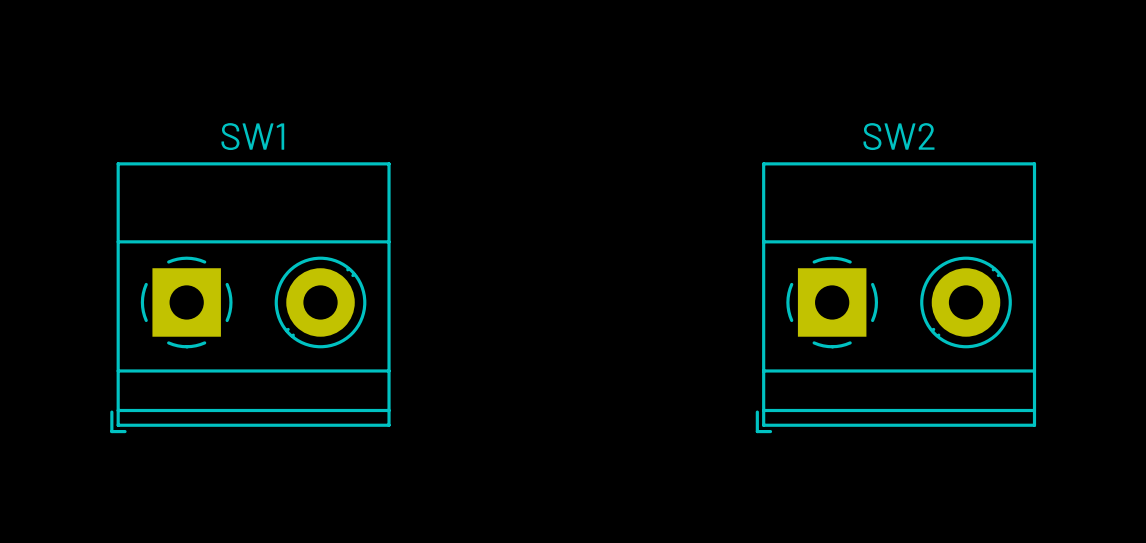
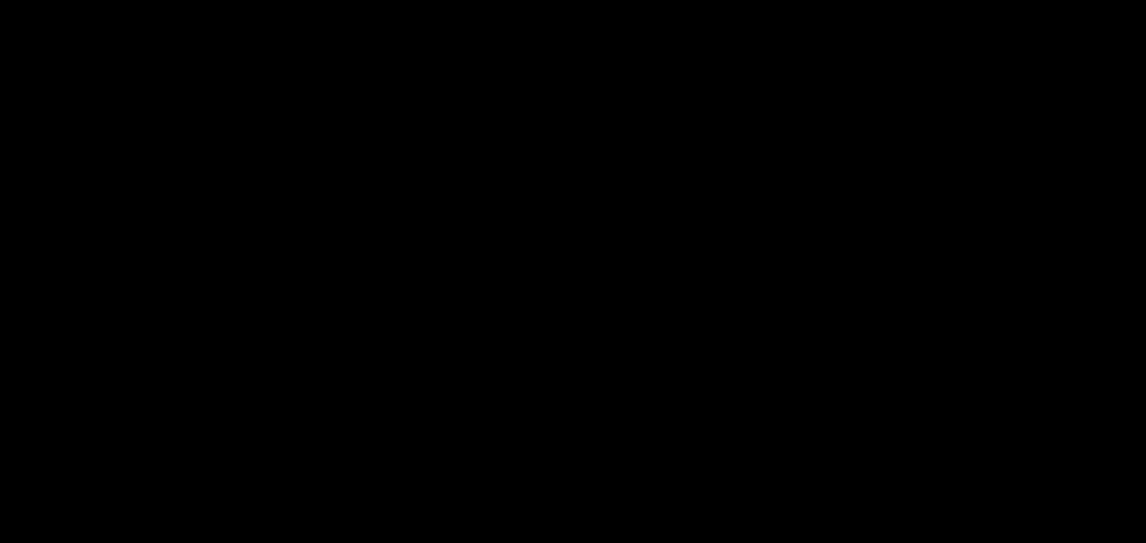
SW1: (250, 297) -> none
SW2: (895, 297) -> none

